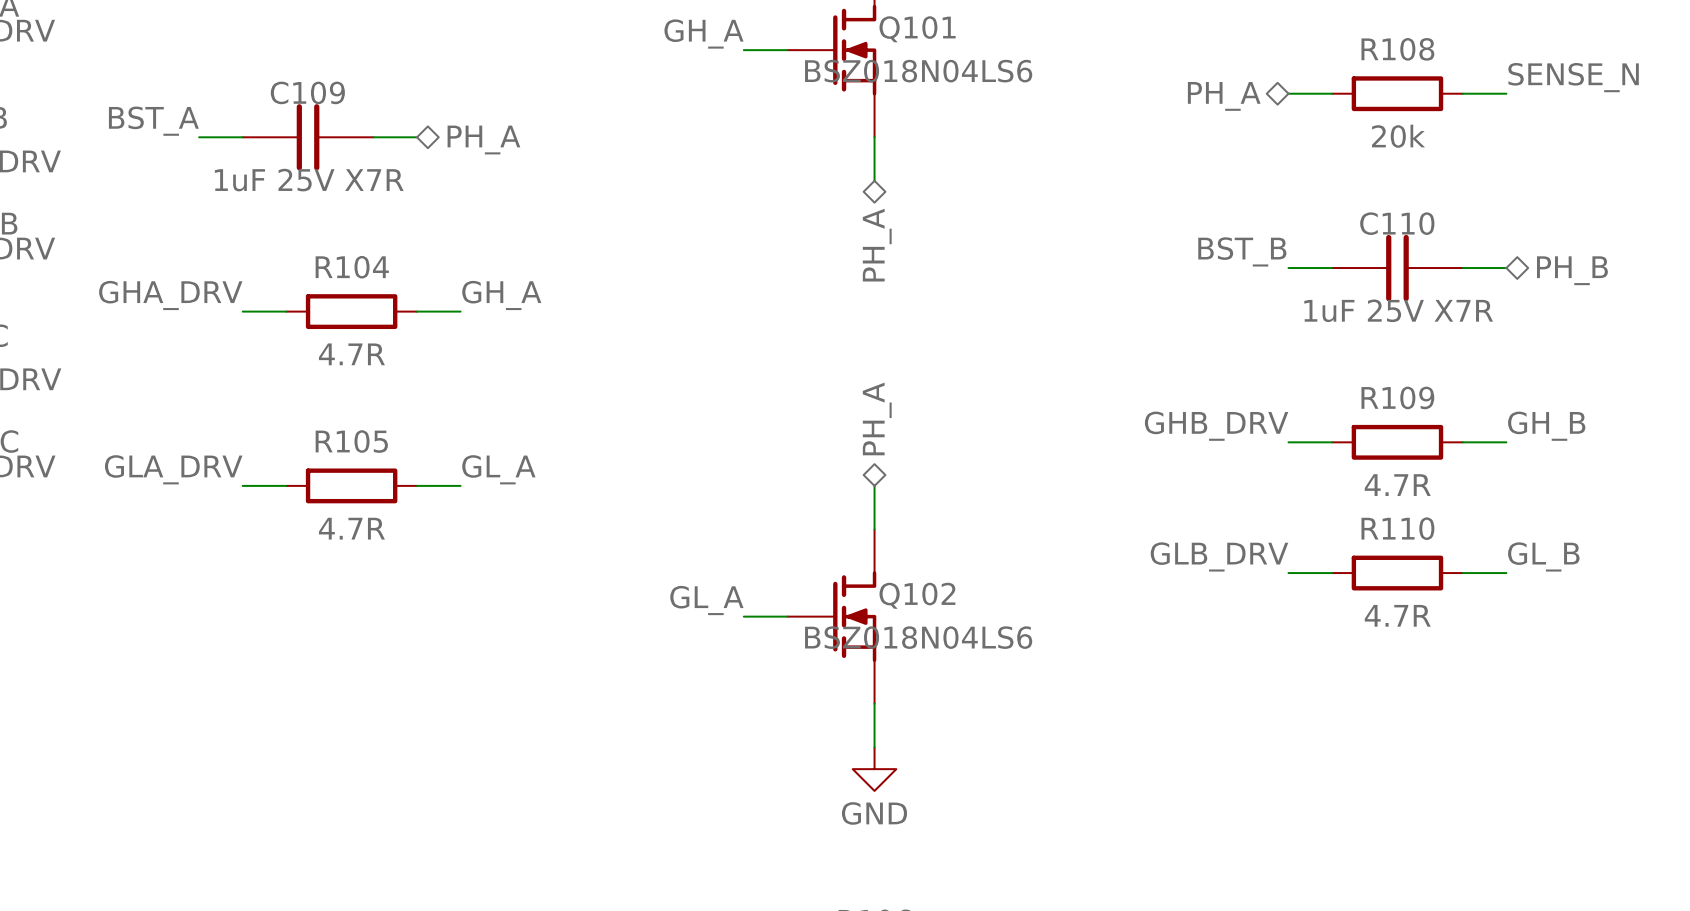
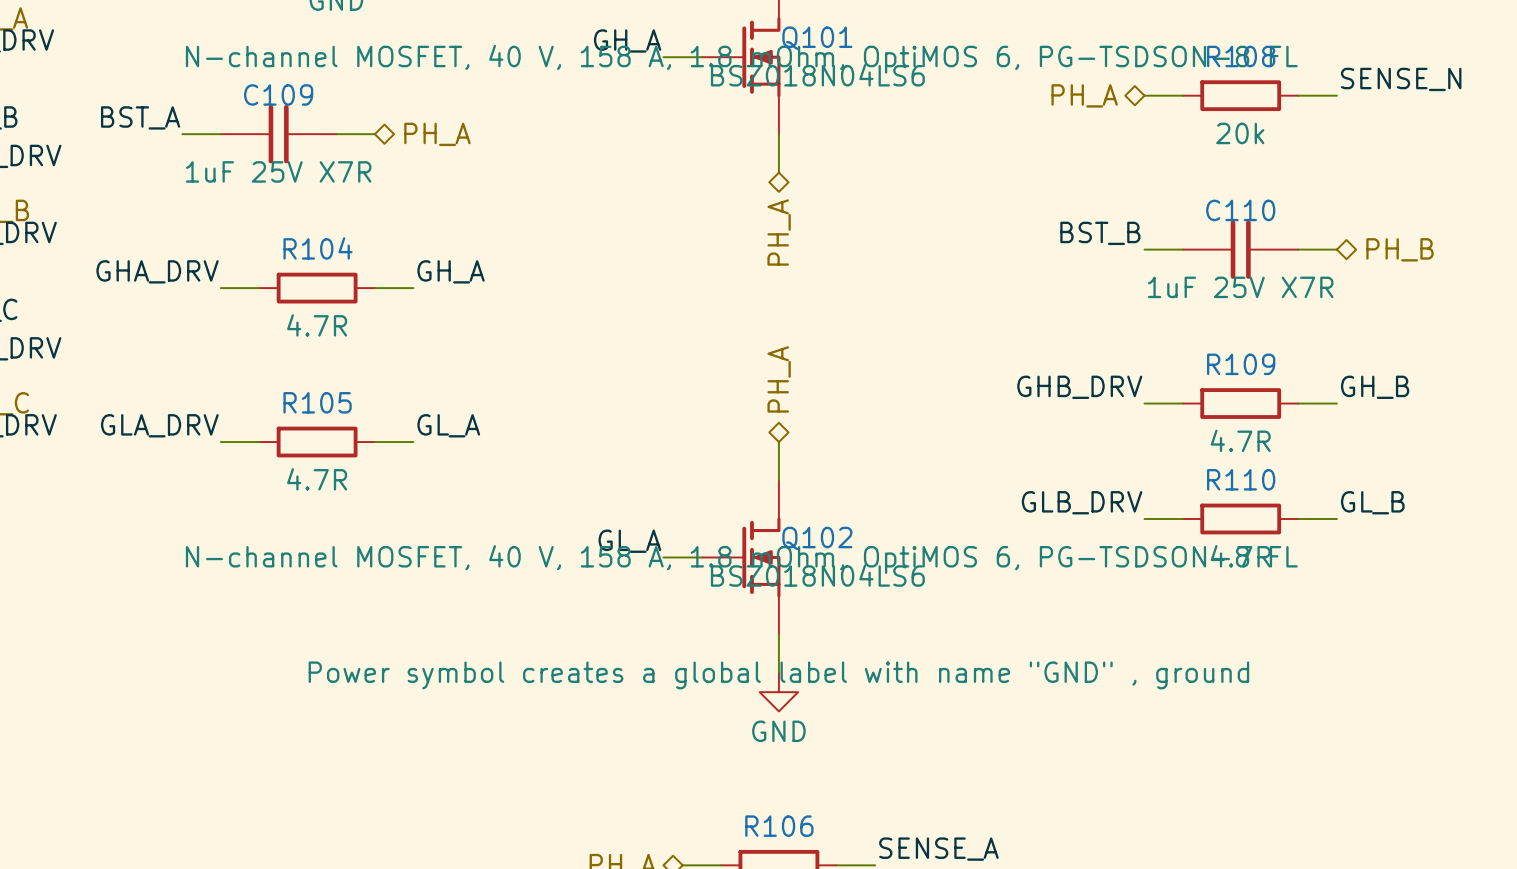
Q101 text: none -> N-channel MOSFET, 40 V, 158 A, 1.8 mOhm, OptiMOS 6, PG-TSDSON-8 FL (741, 59)
Q102 text: none -> N-channel MOSFET, 40 V, 158 A, 1.8 mOhm, OptiMOS 6, PG-TSDSON-8 FL (741, 559)
power symbol text: none -> Power symbol creates a global label with name "GND" , ground (778, 675)

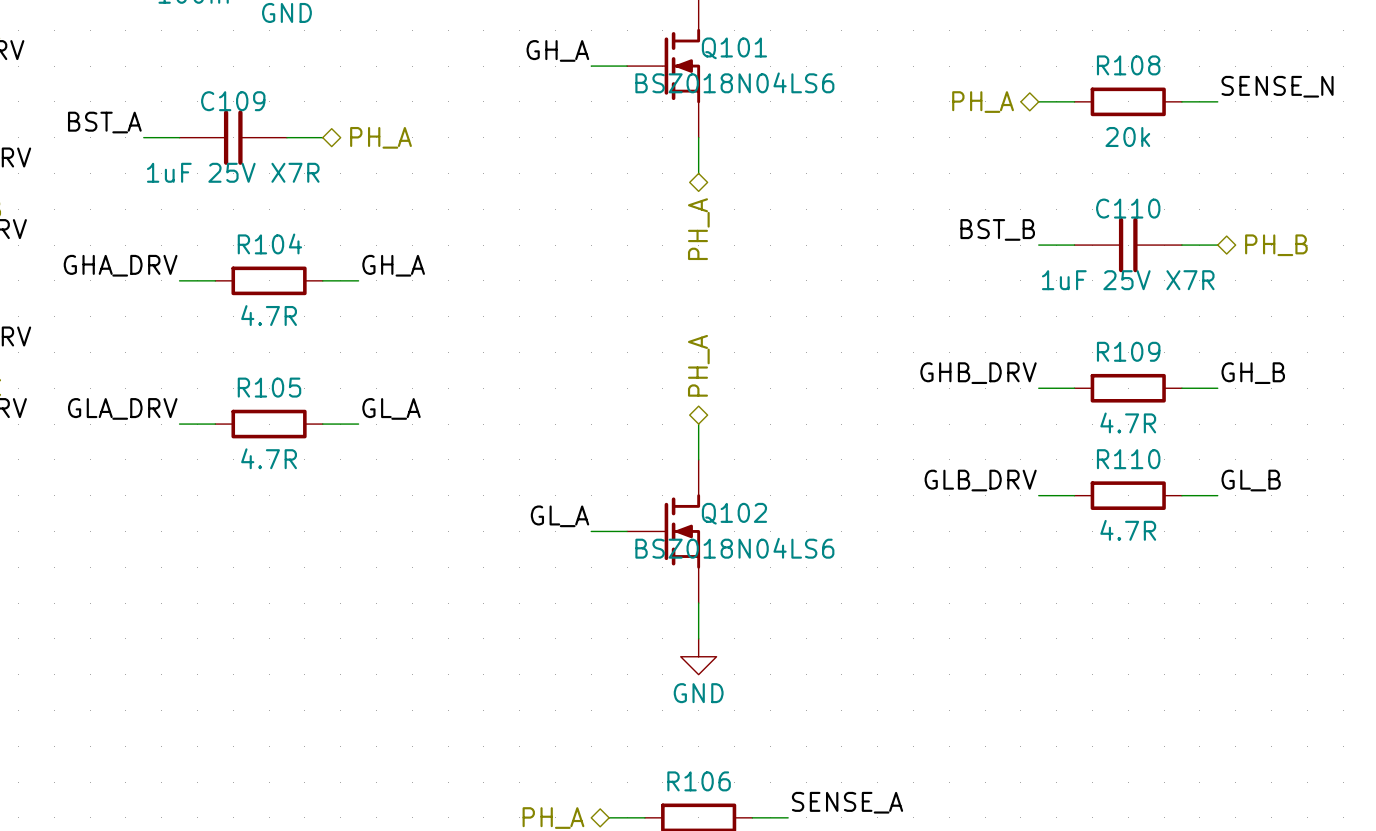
Q101 text: N-channel MOSFET, 40 V, 158 A, 1.8 mOhm, OptiMOS 6, PG-TSDSON-8 FL (741, 59) -> none
Q102 text: N-channel MOSFET, 40 V, 158 A, 1.8 mOhm, OptiMOS 6, PG-TSDSON-8 FL (741, 559) -> none
power symbol text: Power symbol creates a global label with name "GND" , ground (778, 675) -> none

